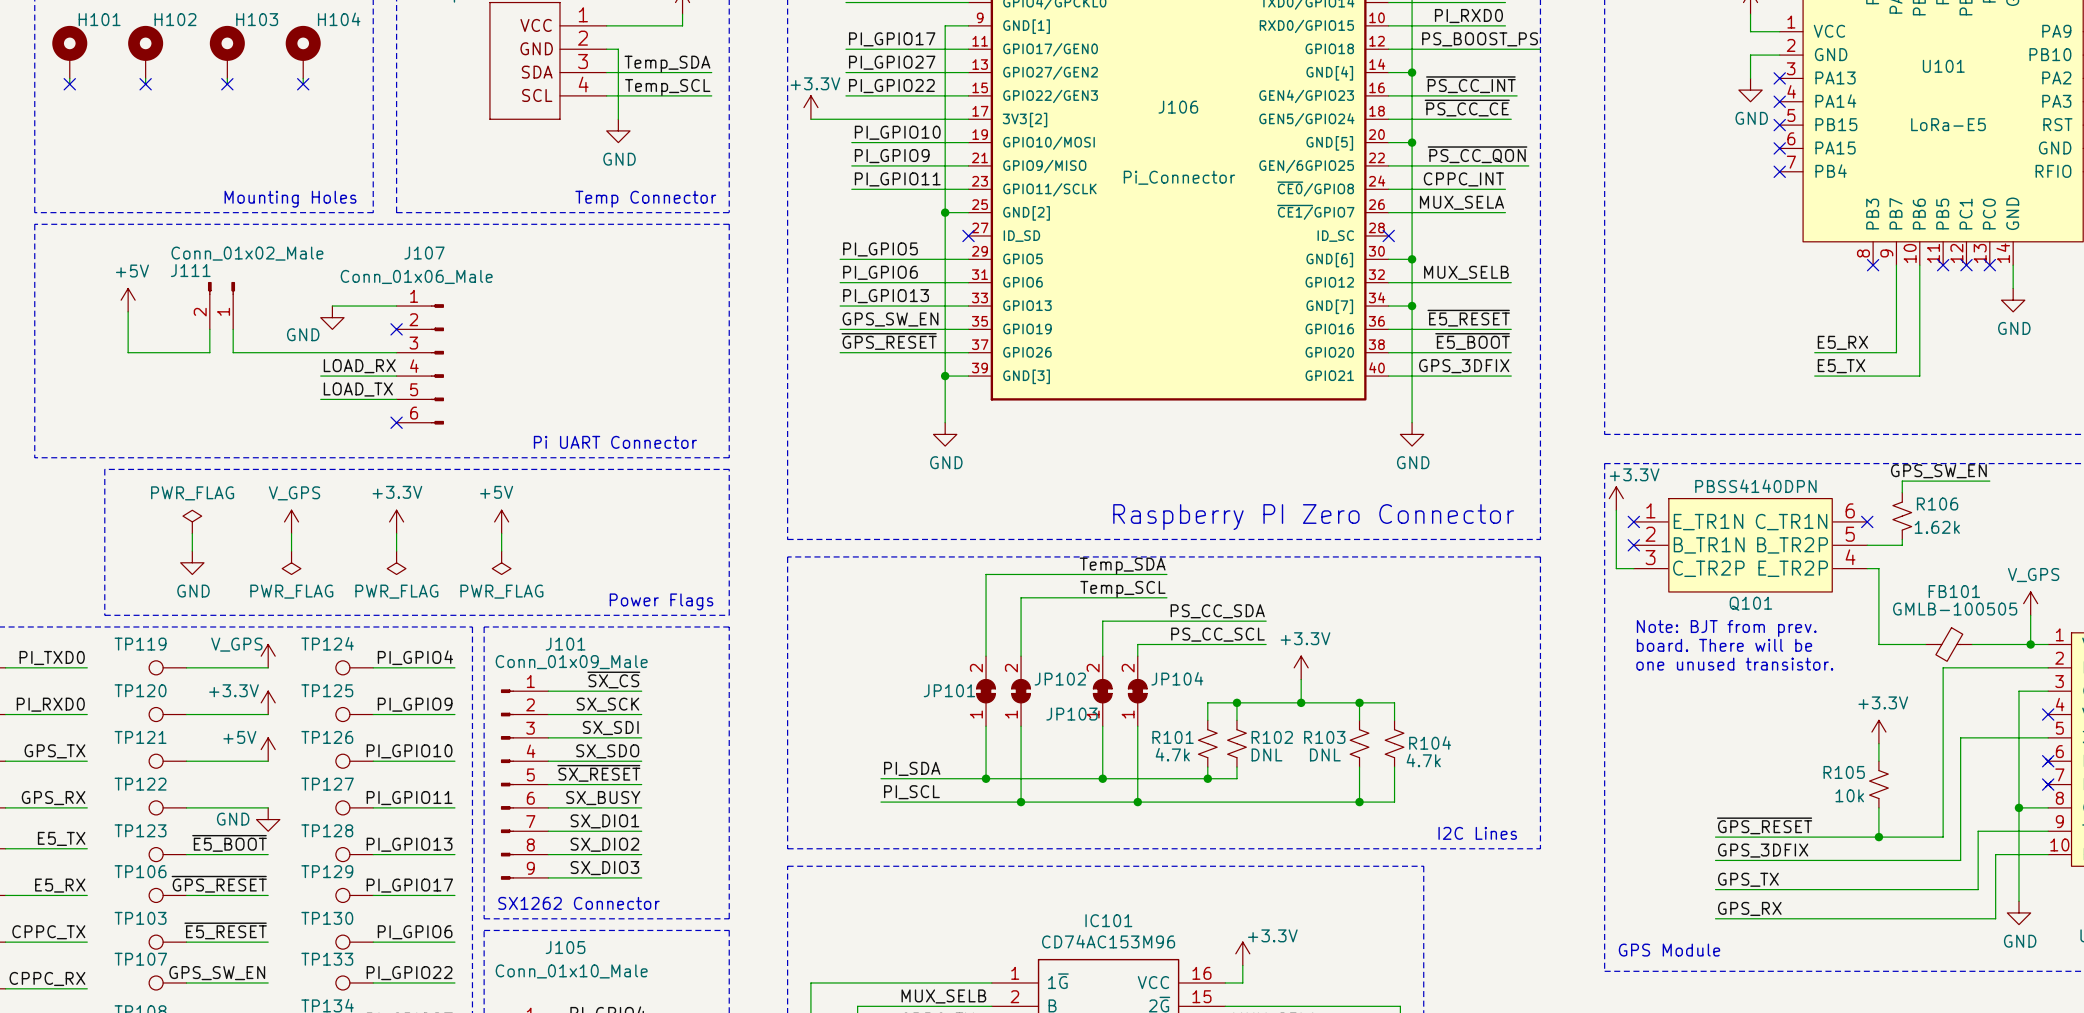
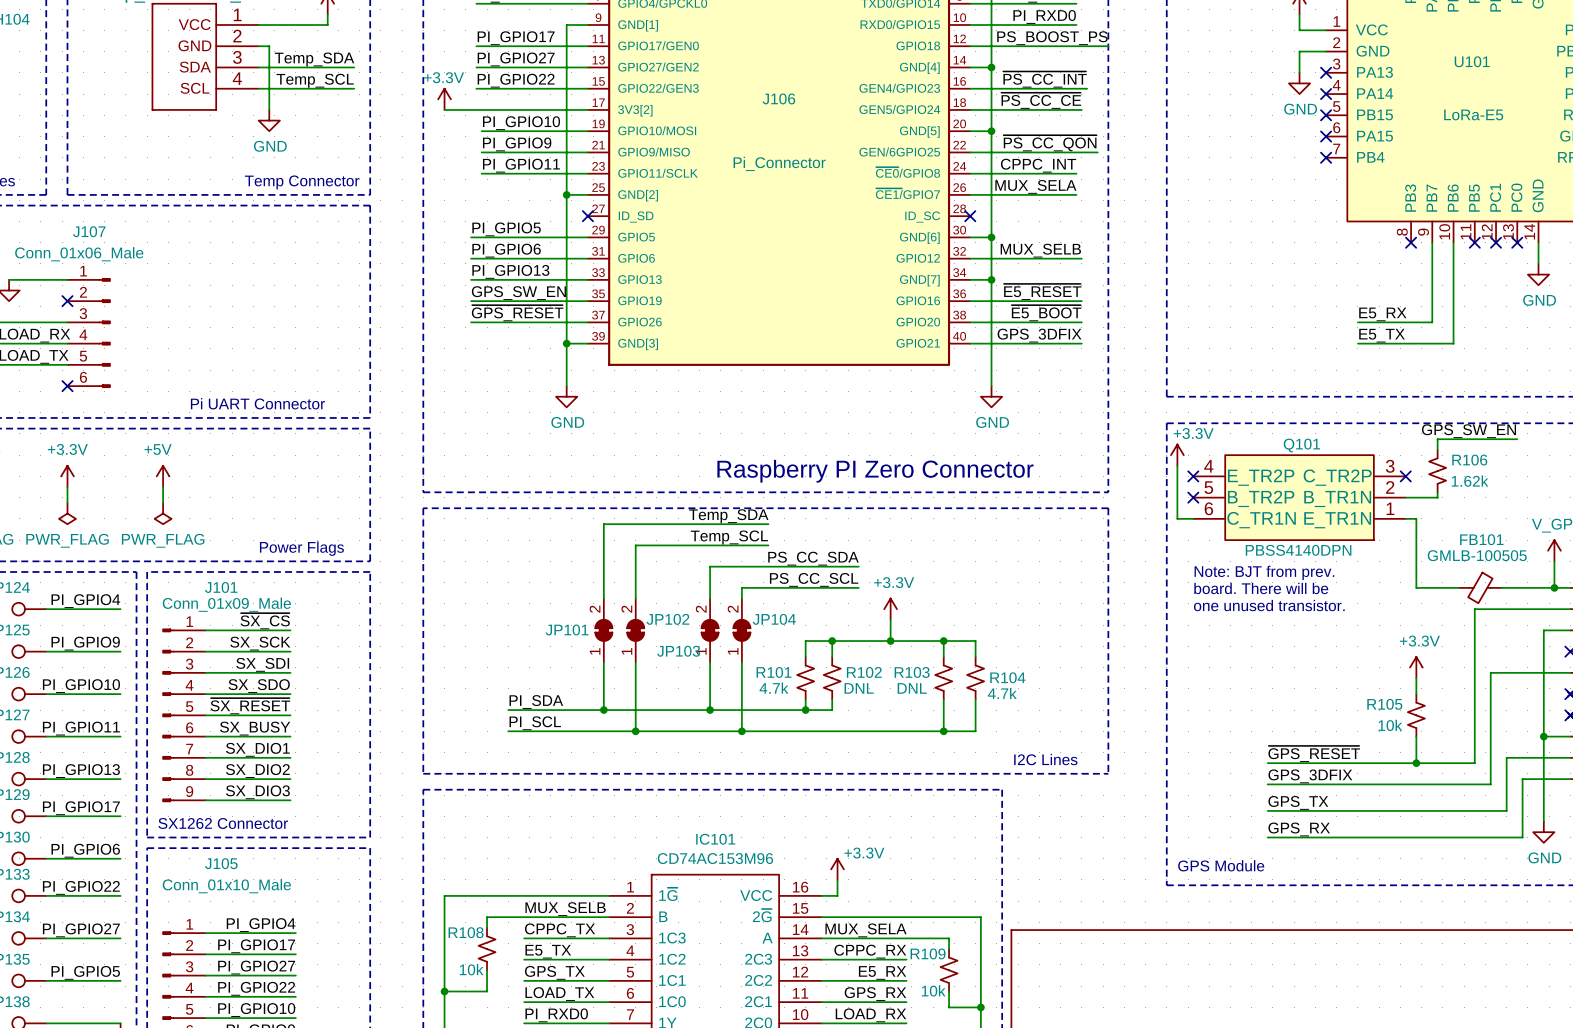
Q101 rotation: 0° (1750, 545) -> 180° (1299, 497)

